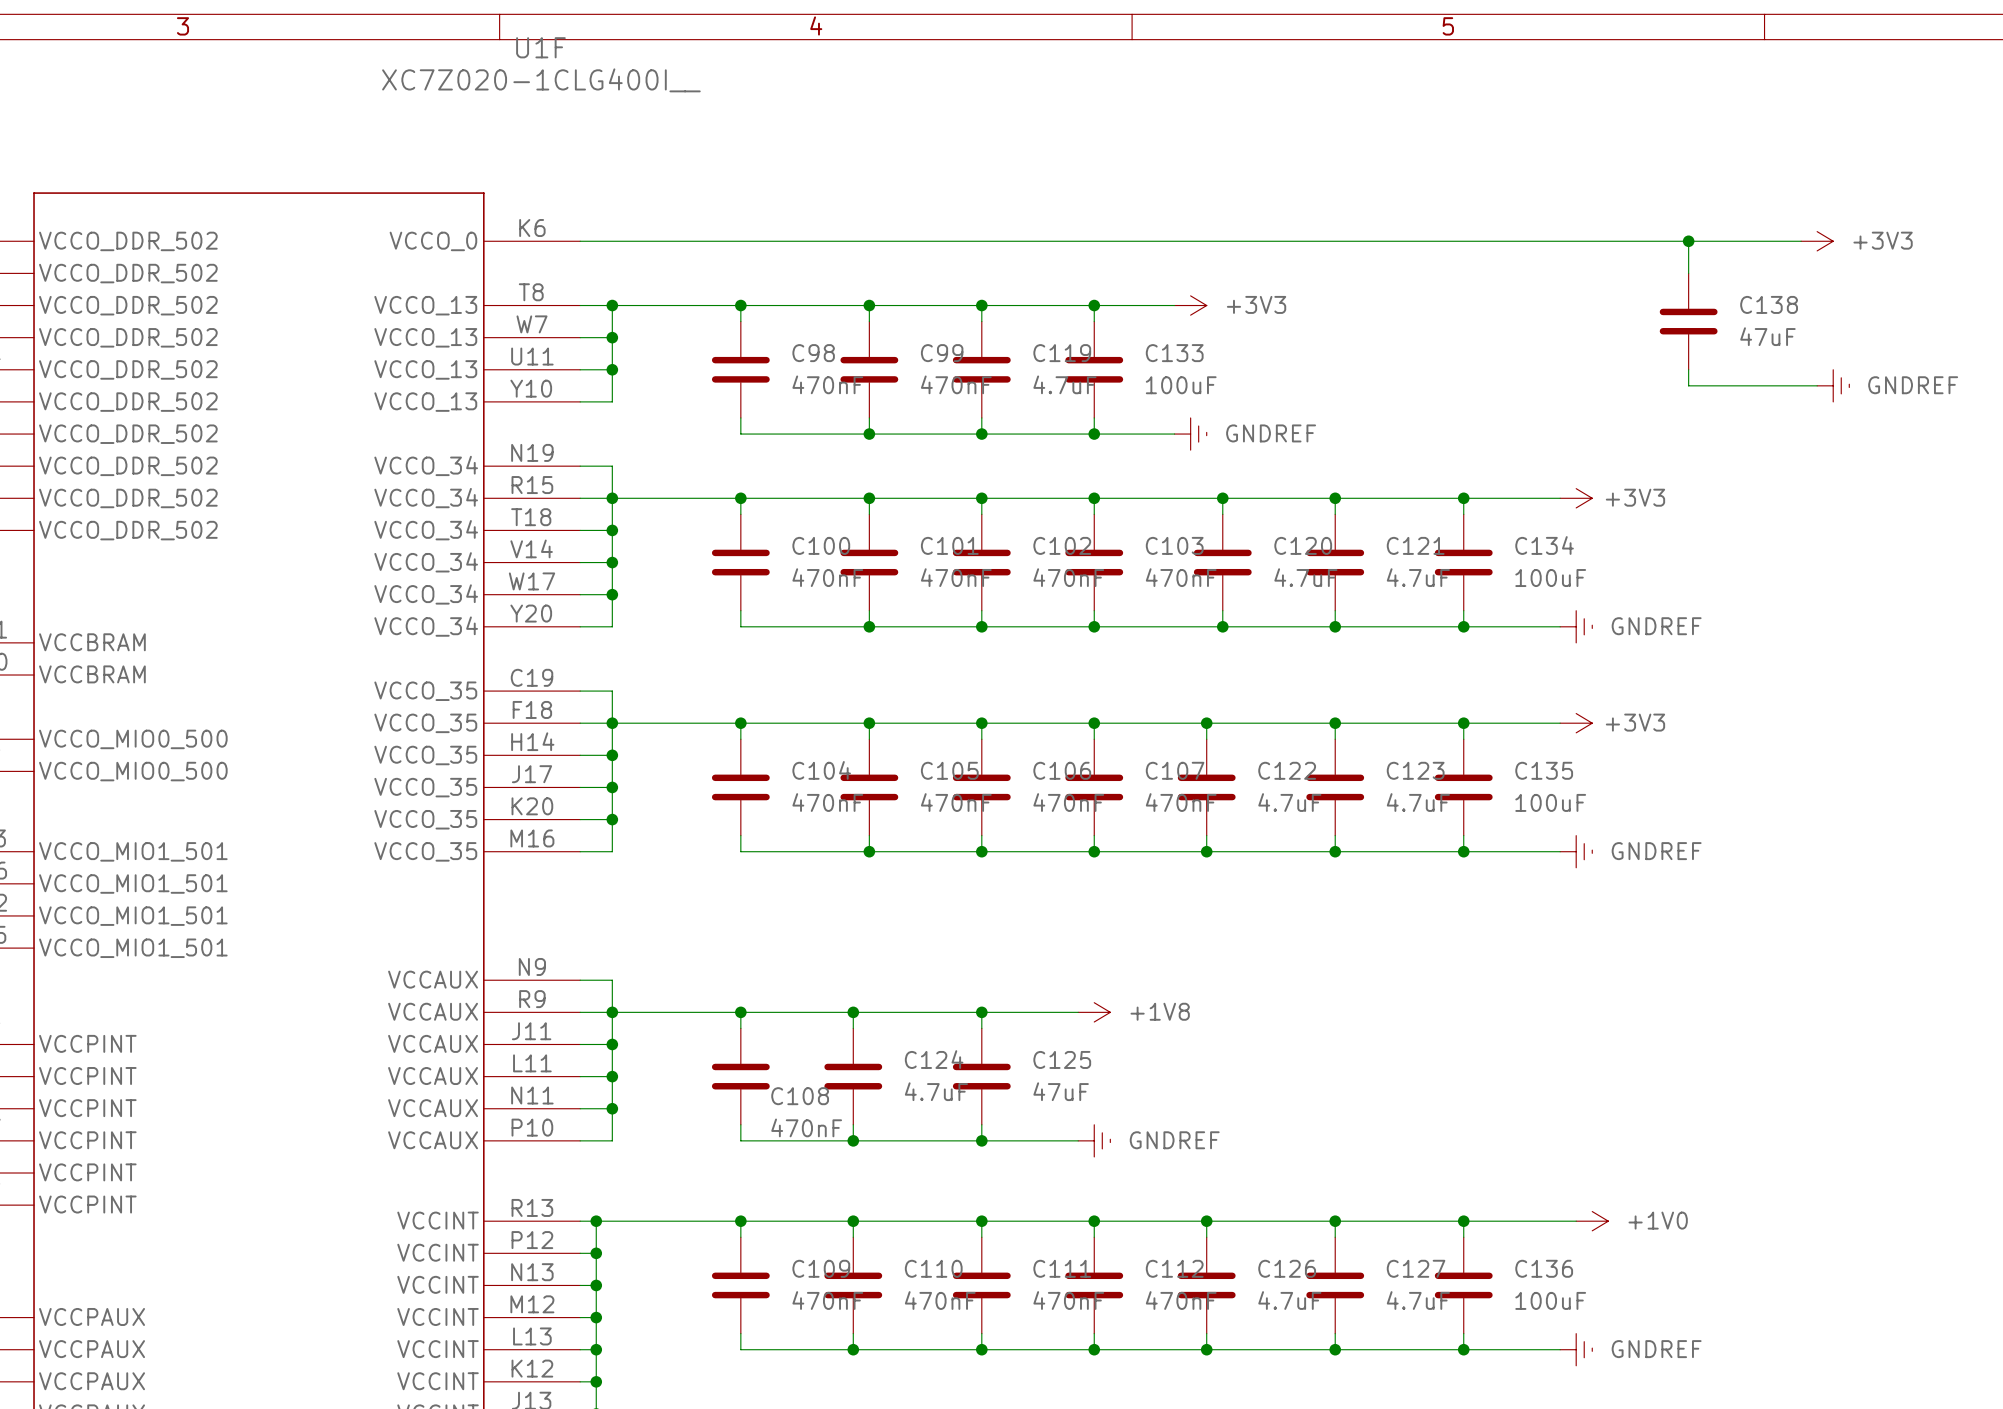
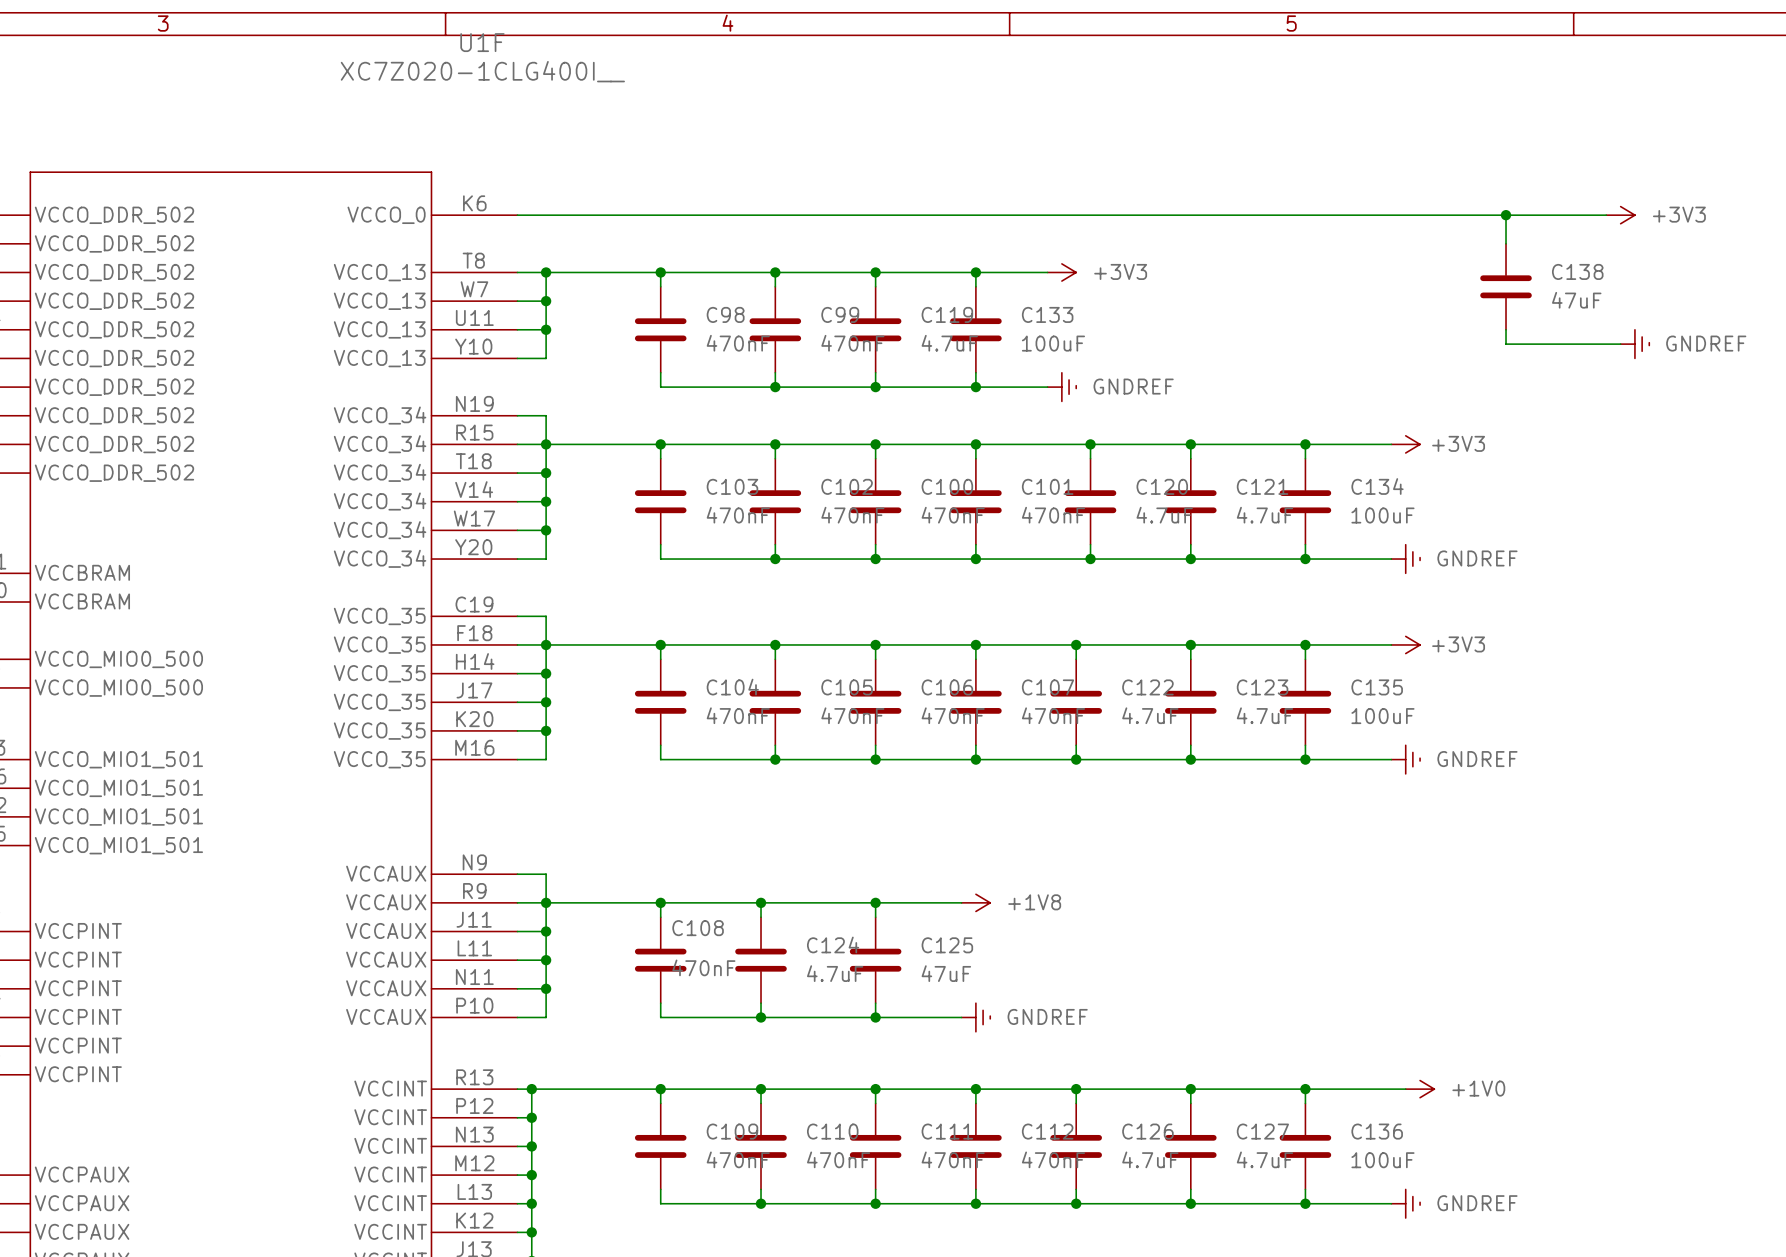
C100 name: C100 (821, 545) -> C103 (732, 486)
C101 name: C101 (949, 545) -> C102 (847, 486)
C102 name: C102 (1062, 545) -> C100 (947, 486)
C103 name: C103 (1174, 545) -> C101 (1047, 486)
C108 name position: C108 (800, 1096) -> C108 (698, 928)
C108 value position: 470nF (806, 1127) -> 470nF (703, 967)

